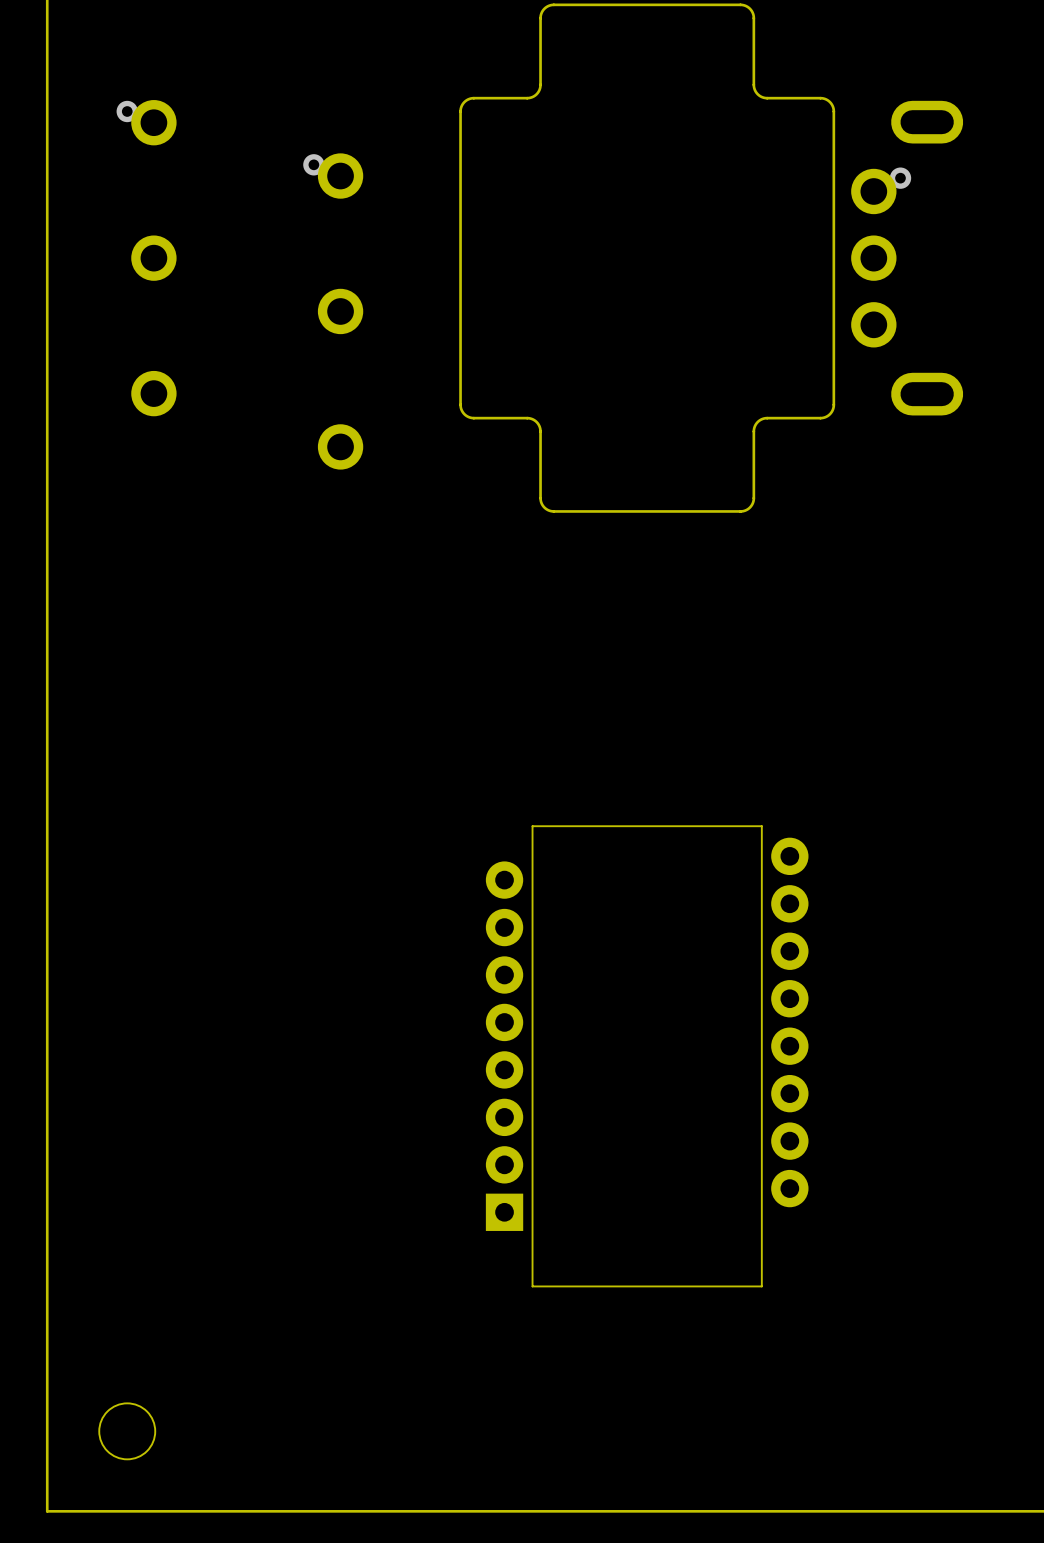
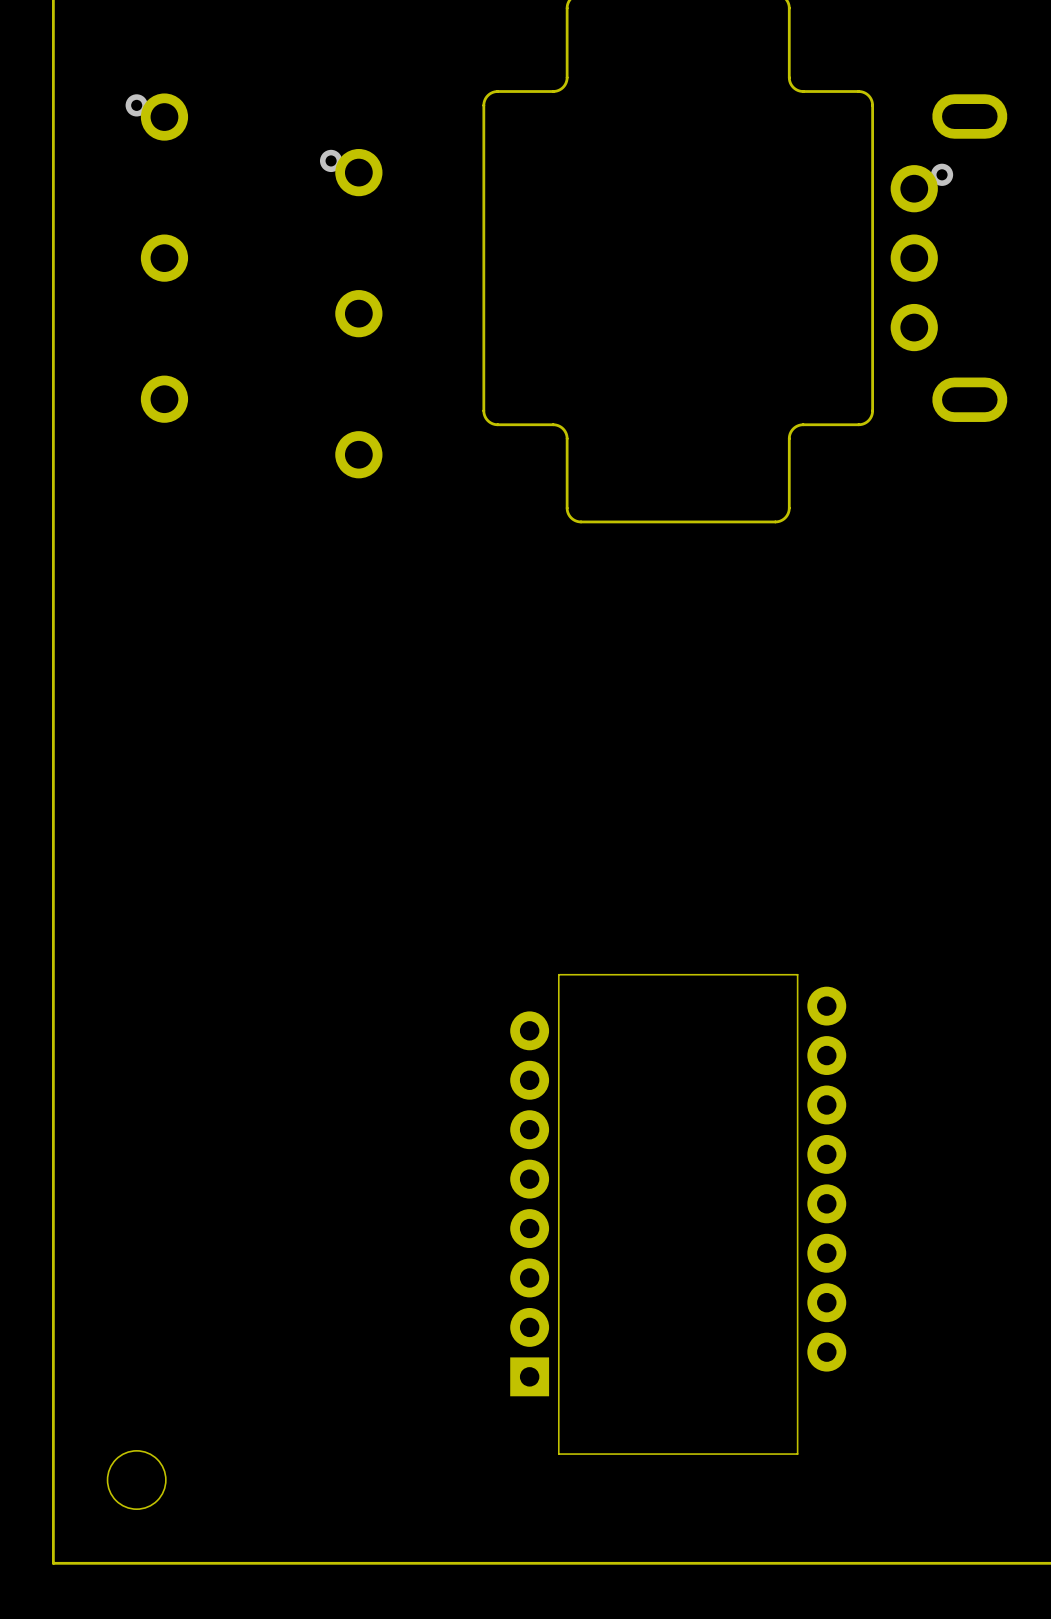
part position: (647, 1056) -> (678, 1214)

